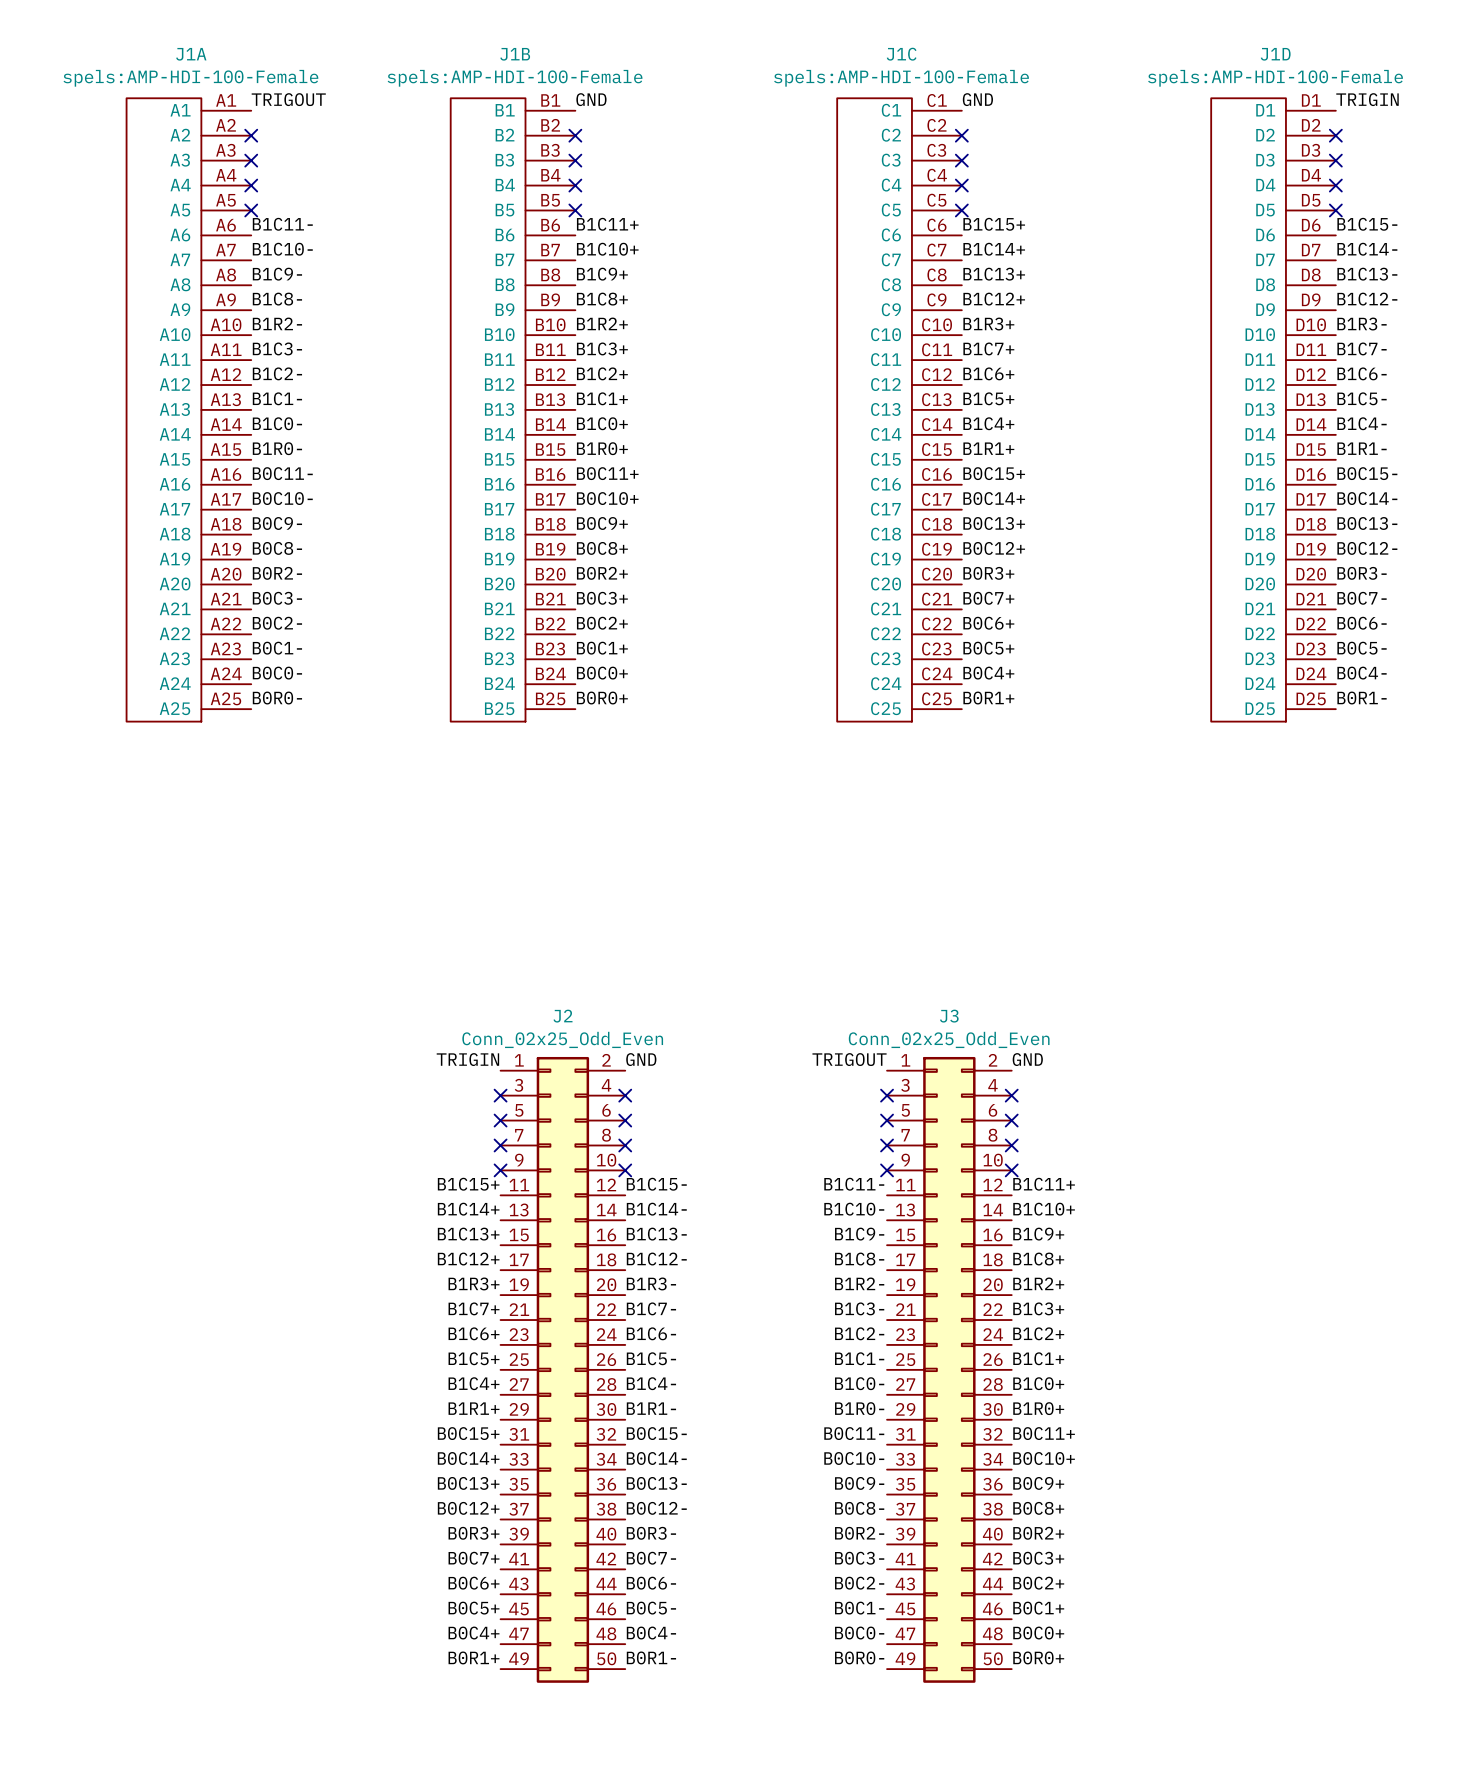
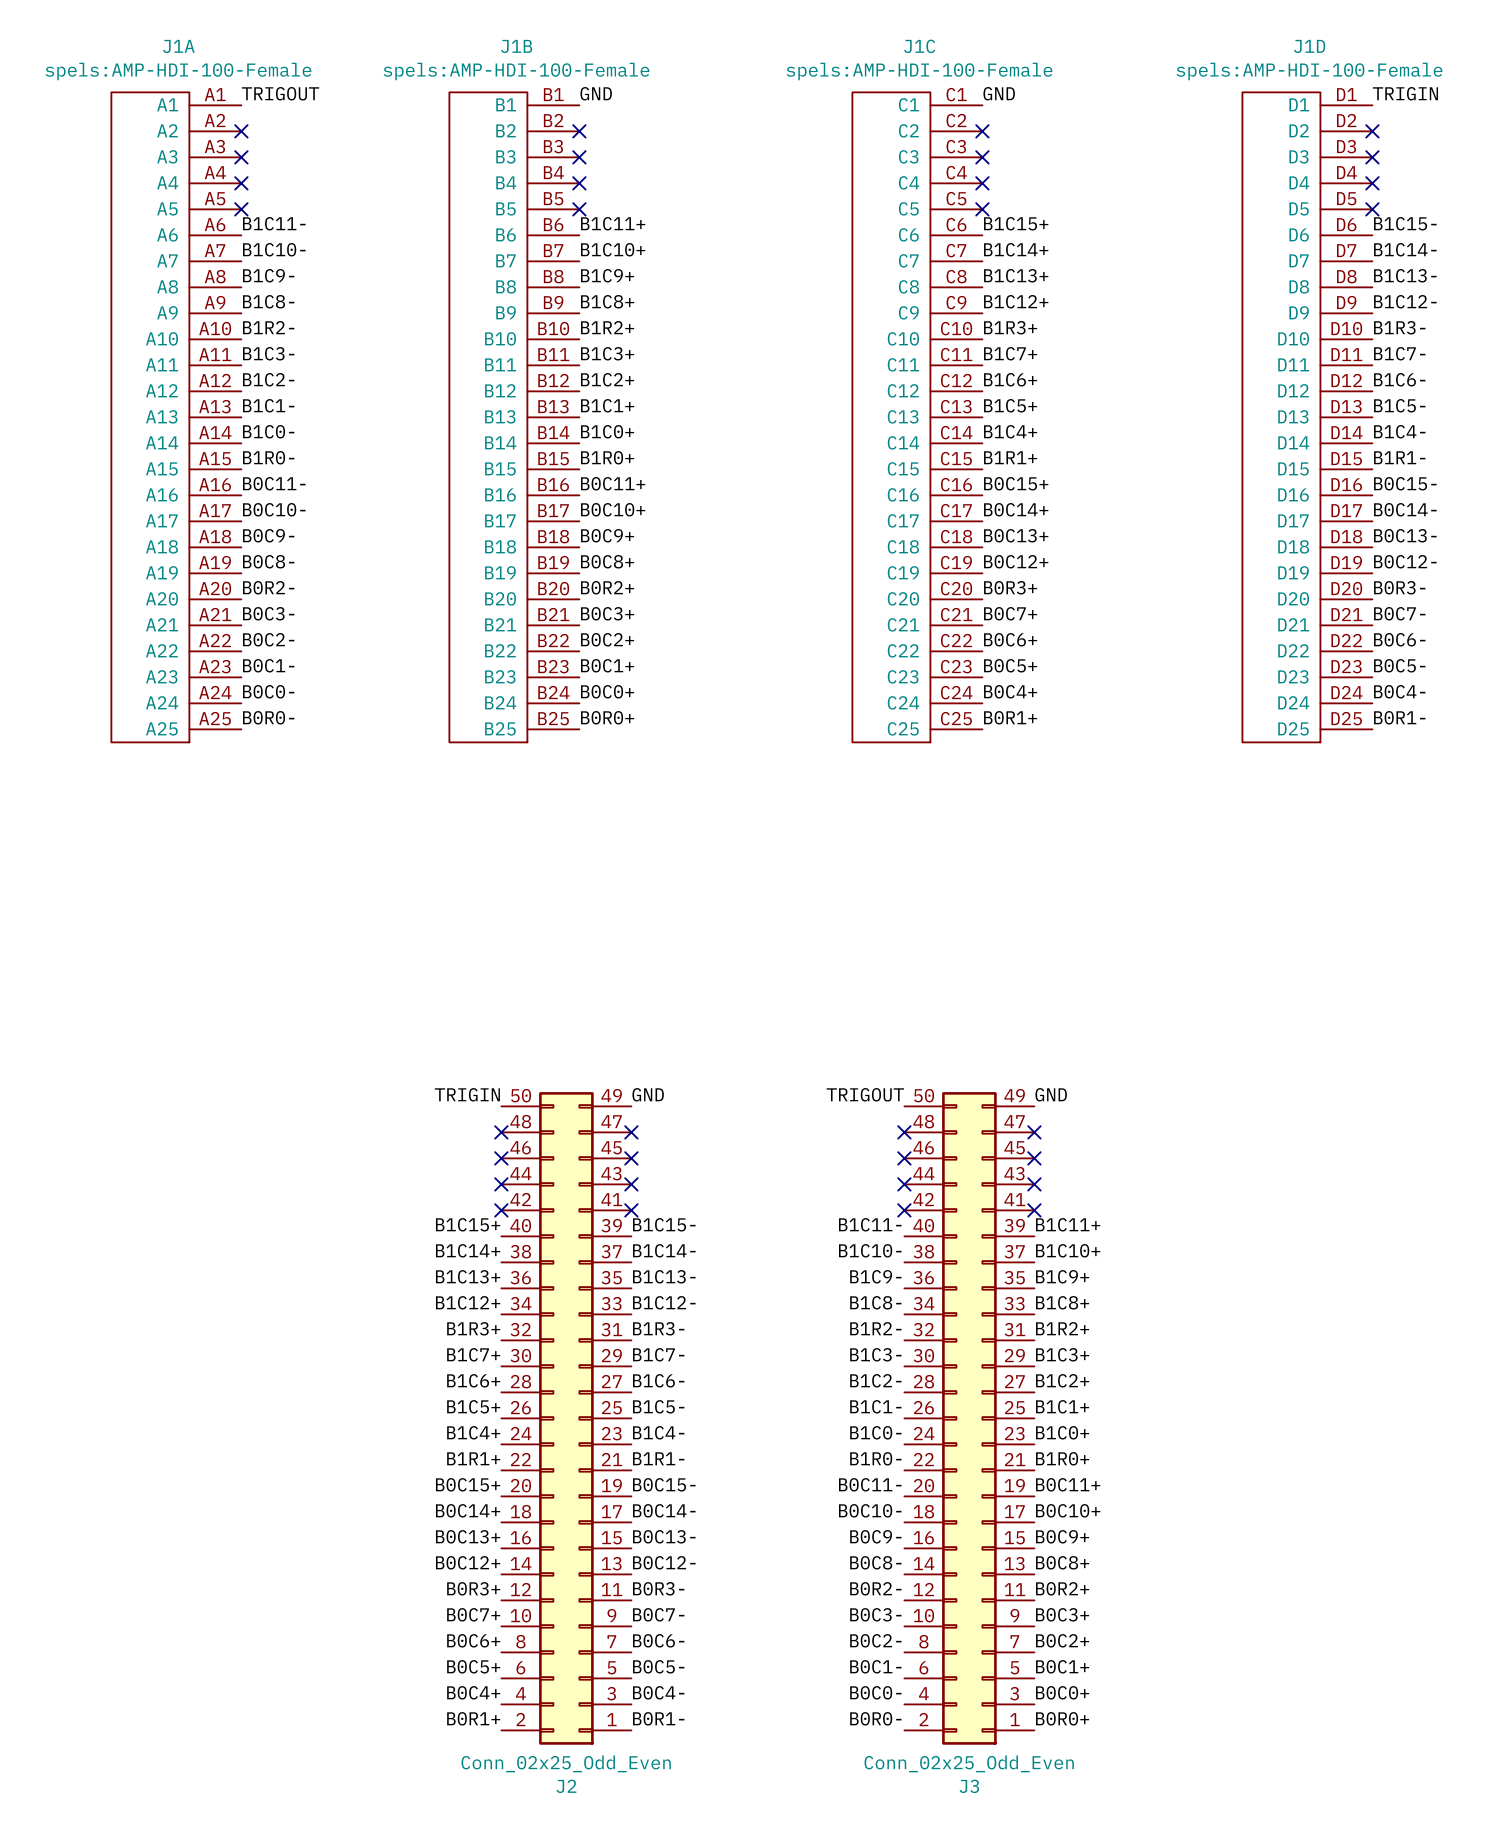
J2 rotation: 0° (562, 1369) -> 180° (566, 1418)
J3 rotation: 0° (949, 1369) -> 180° (969, 1418)

